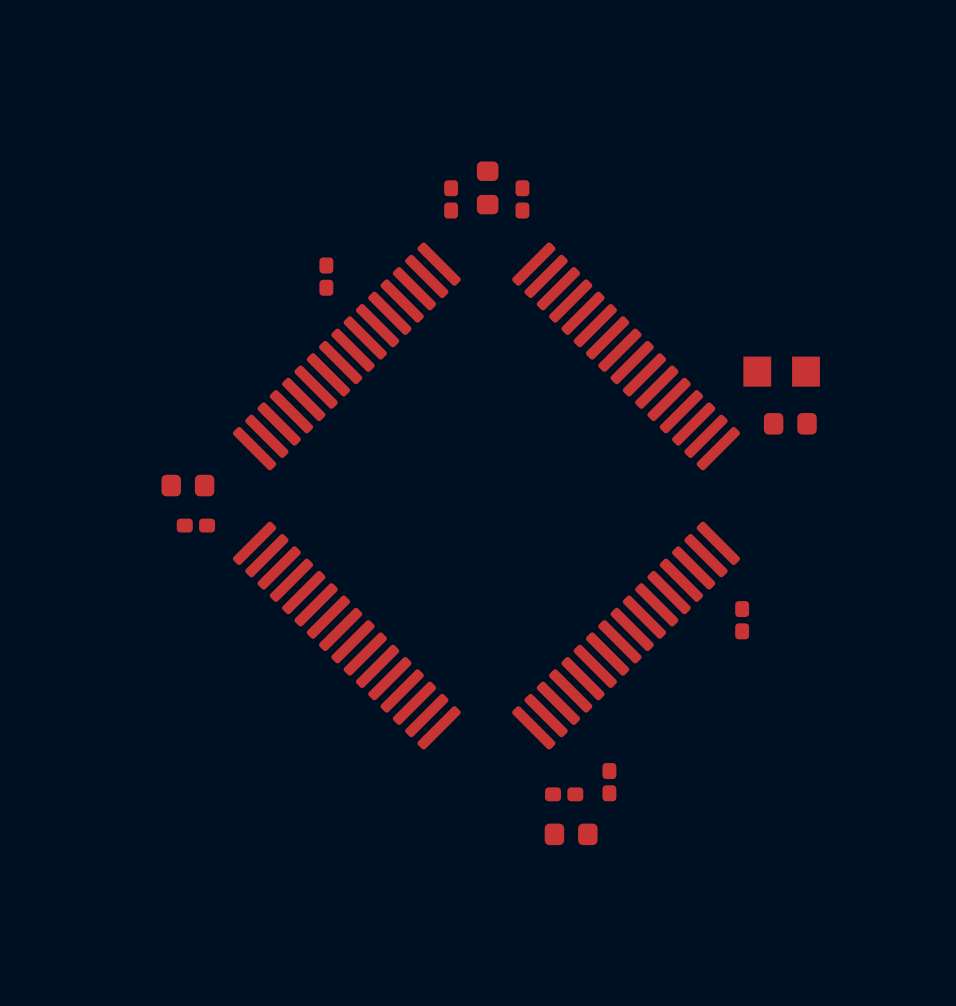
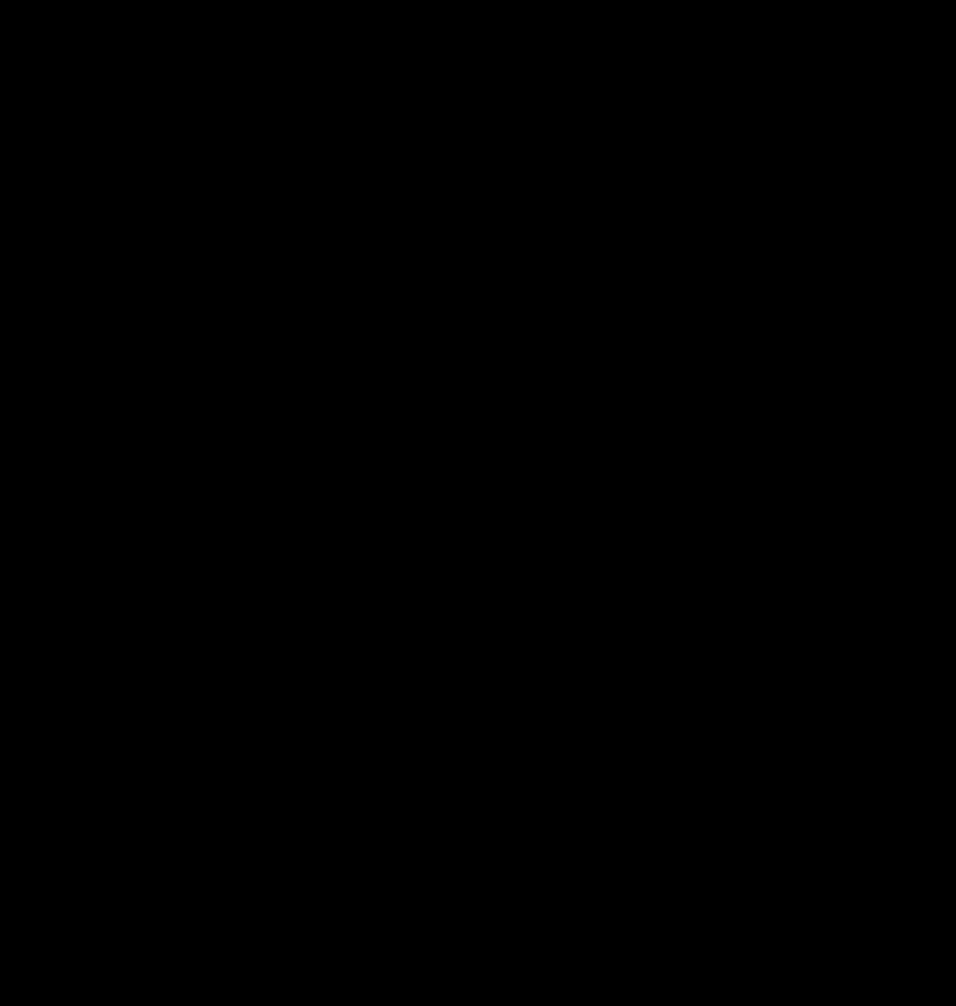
part: (487, 187) -> none
part: (451, 199) -> none
part: (522, 199) -> none
part: (326, 276) -> none
part: (781, 371) -> none
part: (790, 423) -> none
part: (187, 485) -> none
part: (486, 495) -> none
part: (195, 525) -> none
part: (742, 620) -> none
part: (609, 782) -> none
part: (564, 794) -> none
part: (571, 834) -> none

